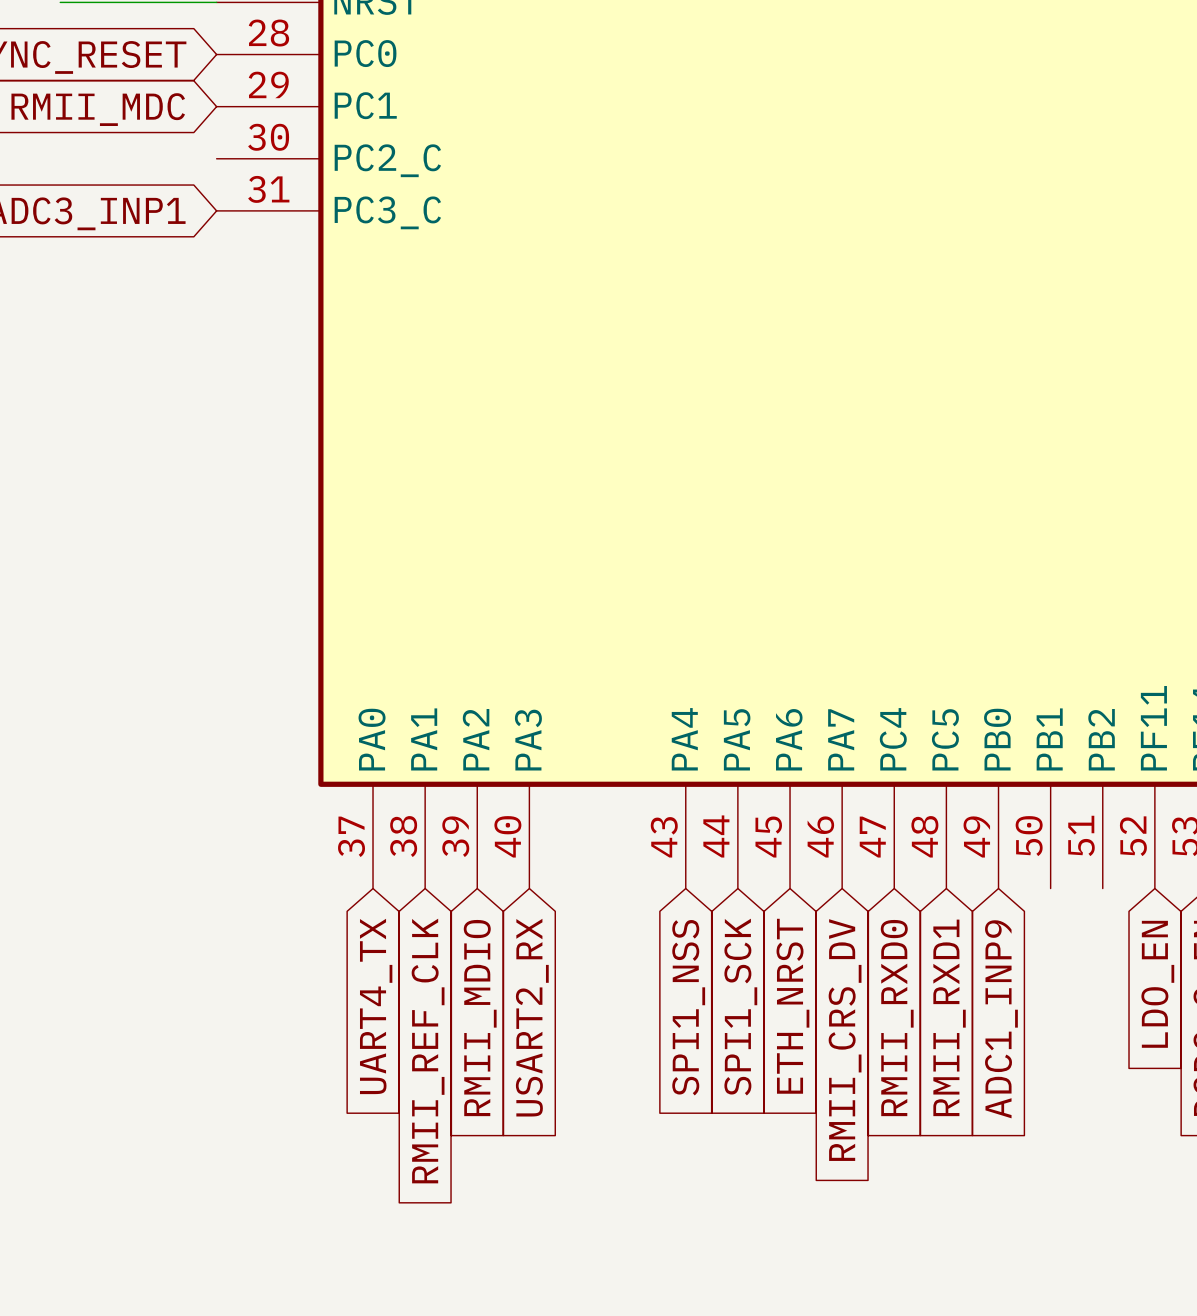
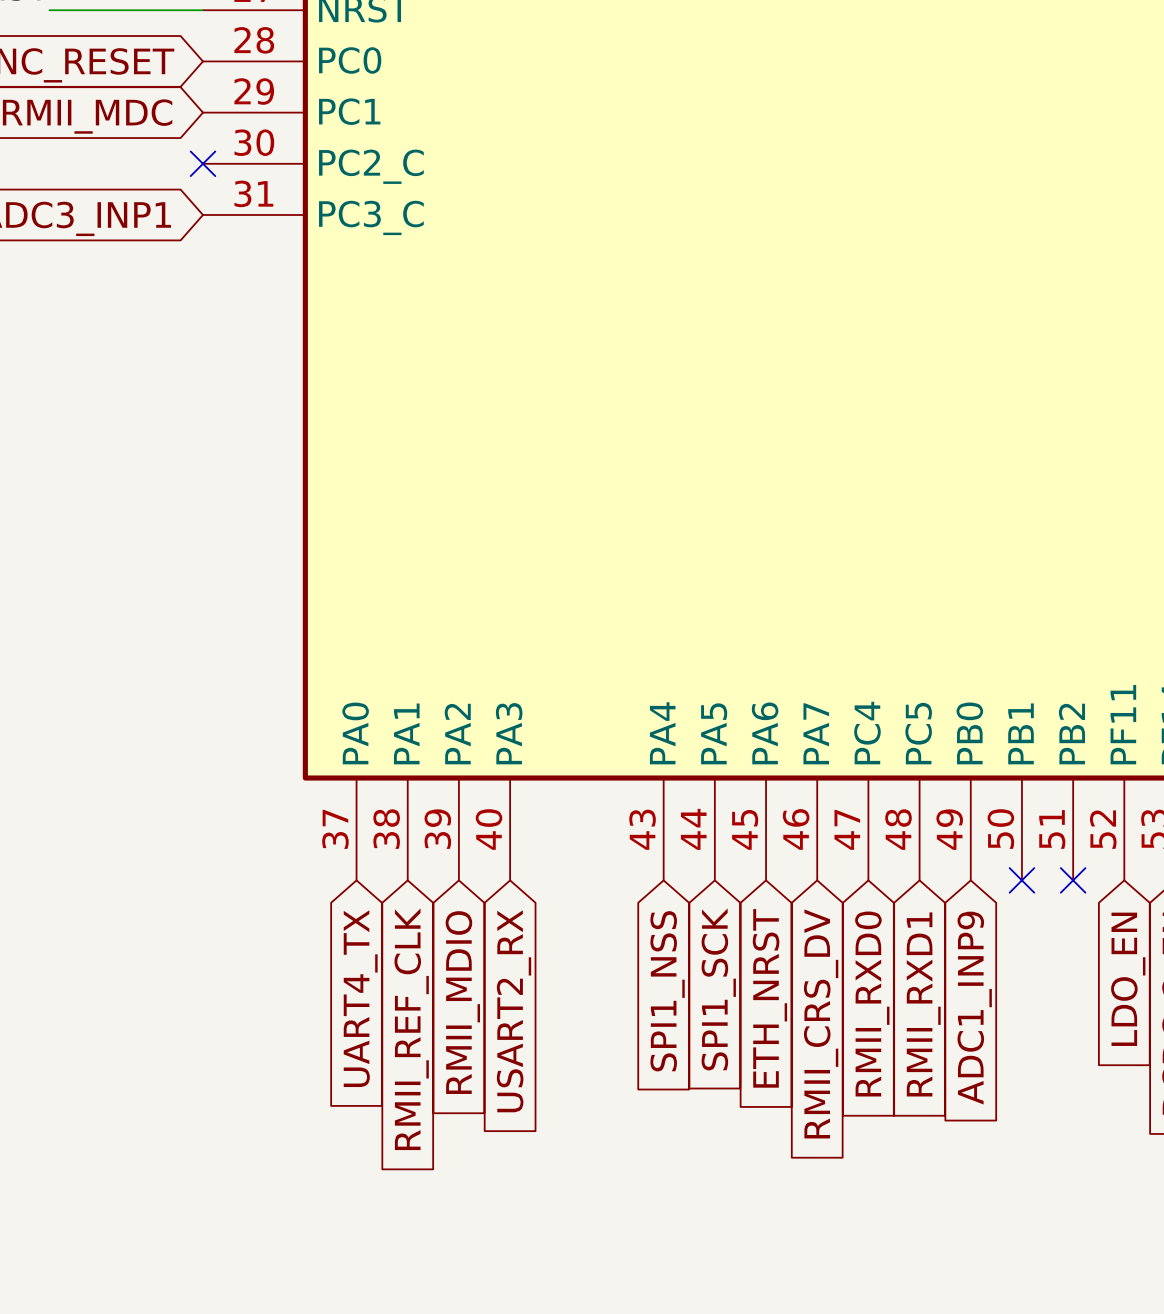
no-connect mark: none -> (202, 163)
no-connect mark: none -> (1021, 880)
no-connect mark: none -> (1073, 880)

